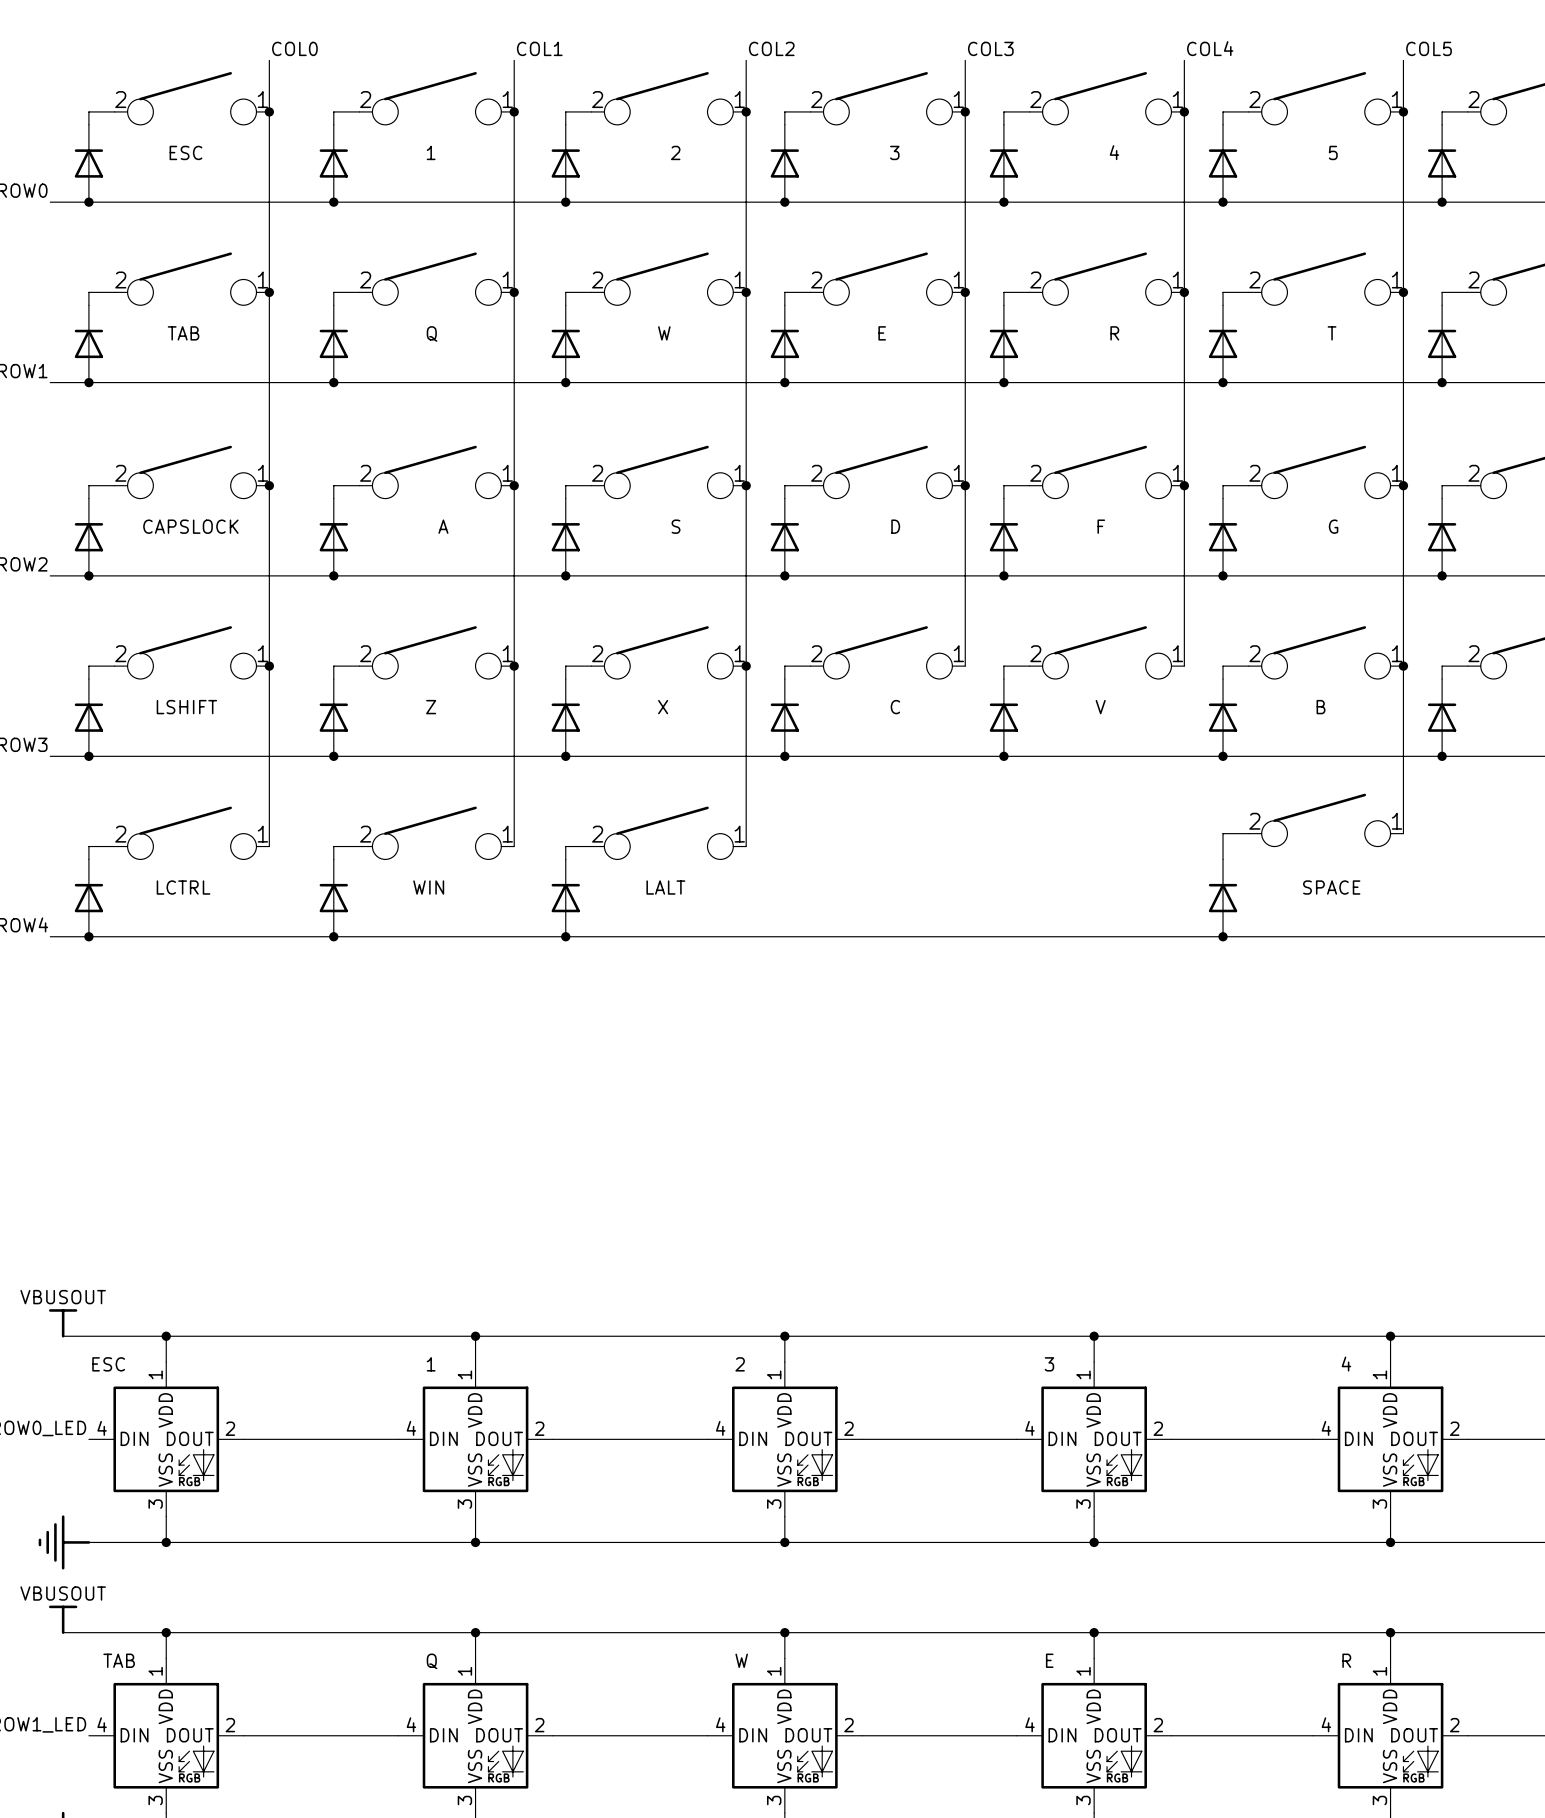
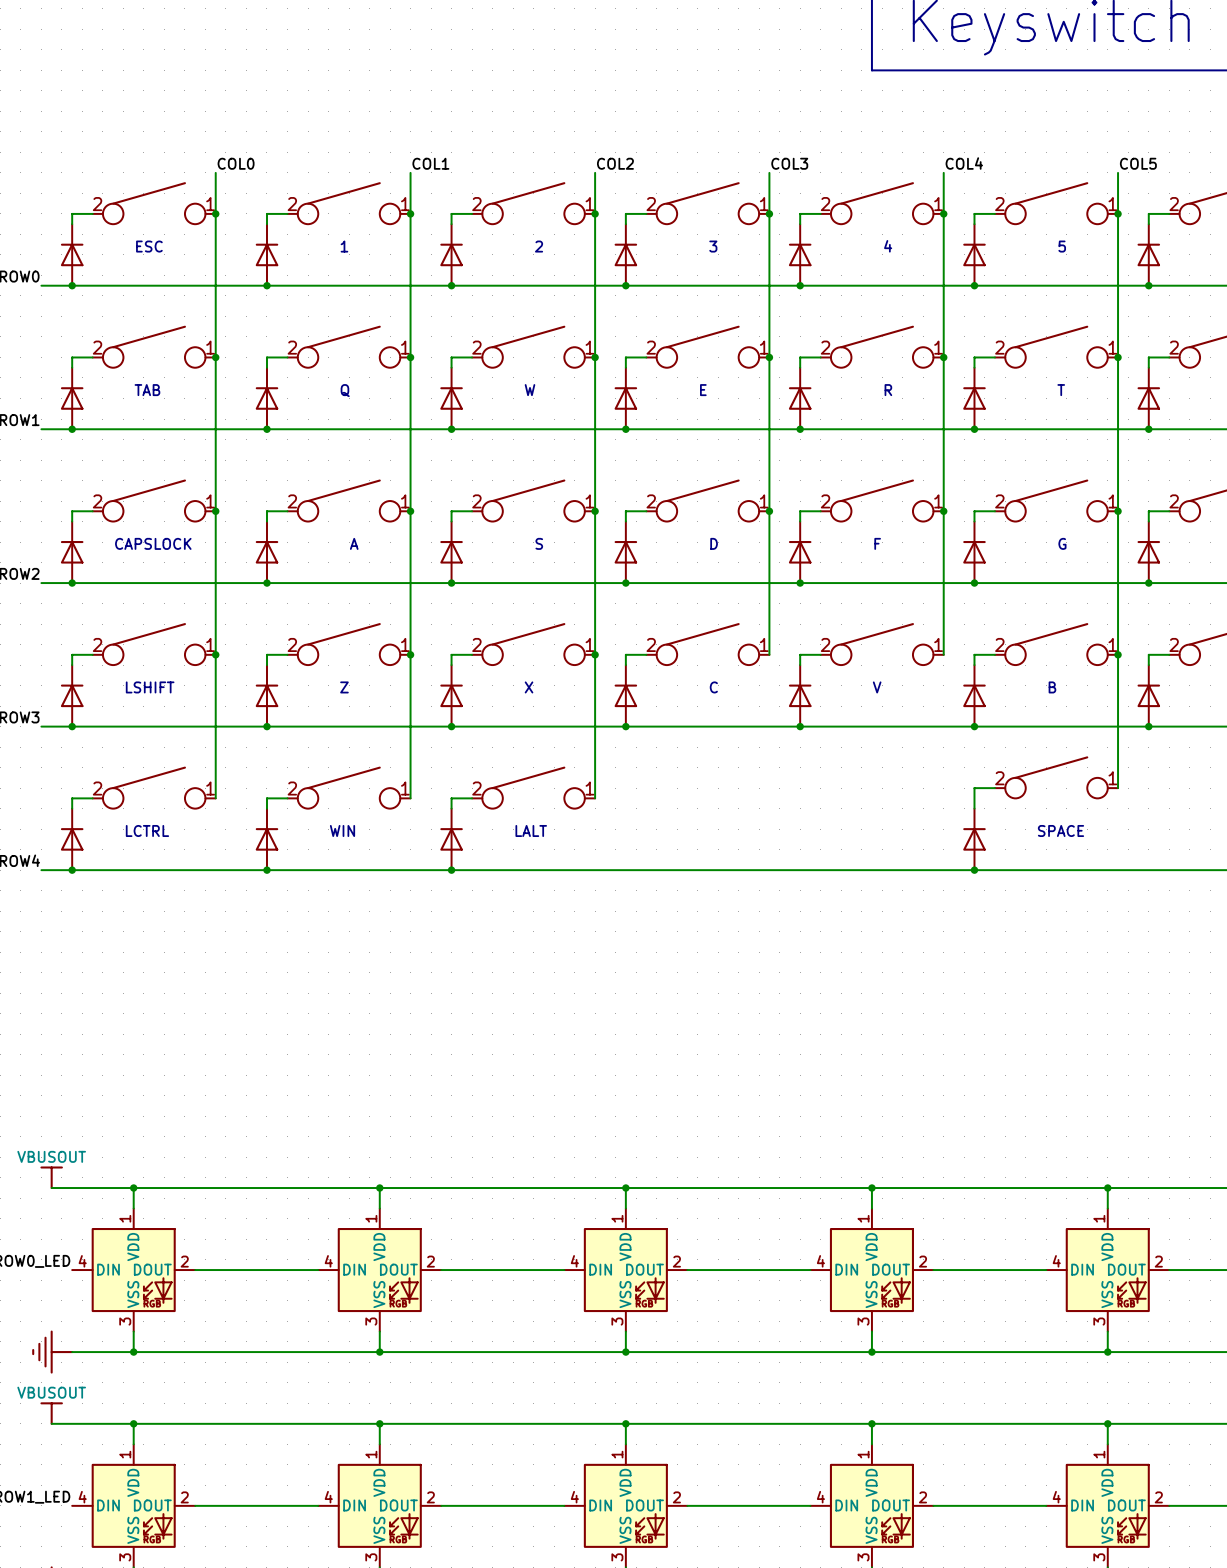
text: ESC (108, 1364) -> none
text: 1 (431, 1364) -> none
text: 2 (740, 1364) -> none
text: 3 (1049, 1364) -> none
text: 4 (1346, 1364) -> none
text: TAB (119, 1660) -> none
text: W (741, 1660) -> none
text: E (1049, 1660) -> none
text: R (1346, 1660) -> none
text: Q (432, 1661) -> none

